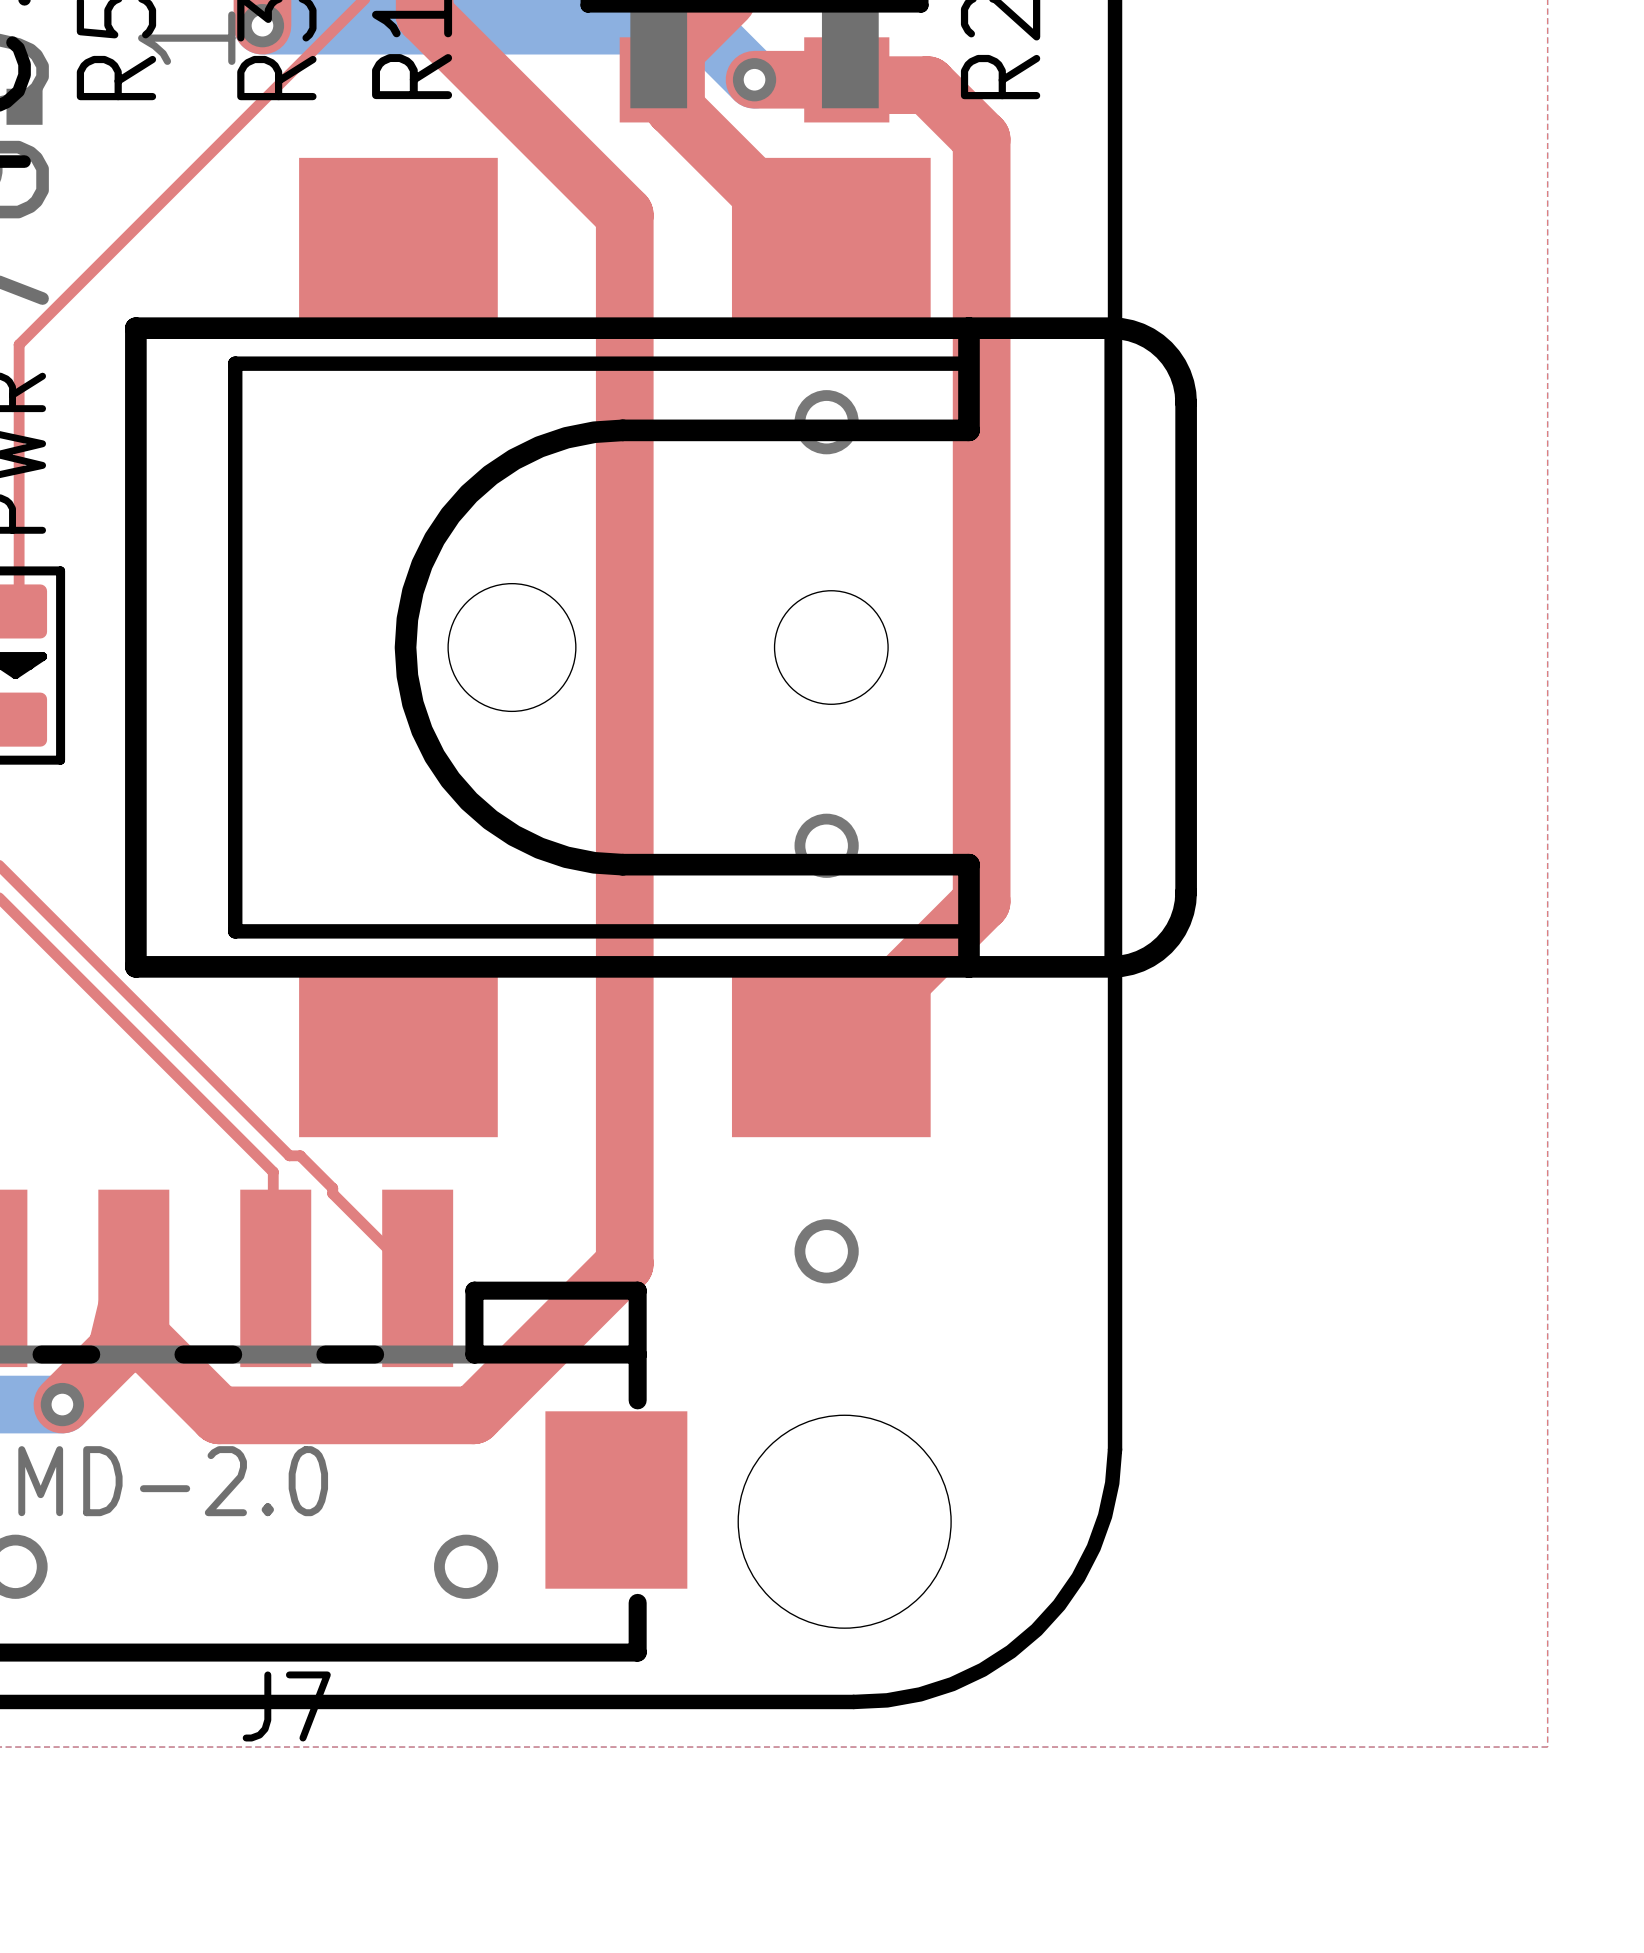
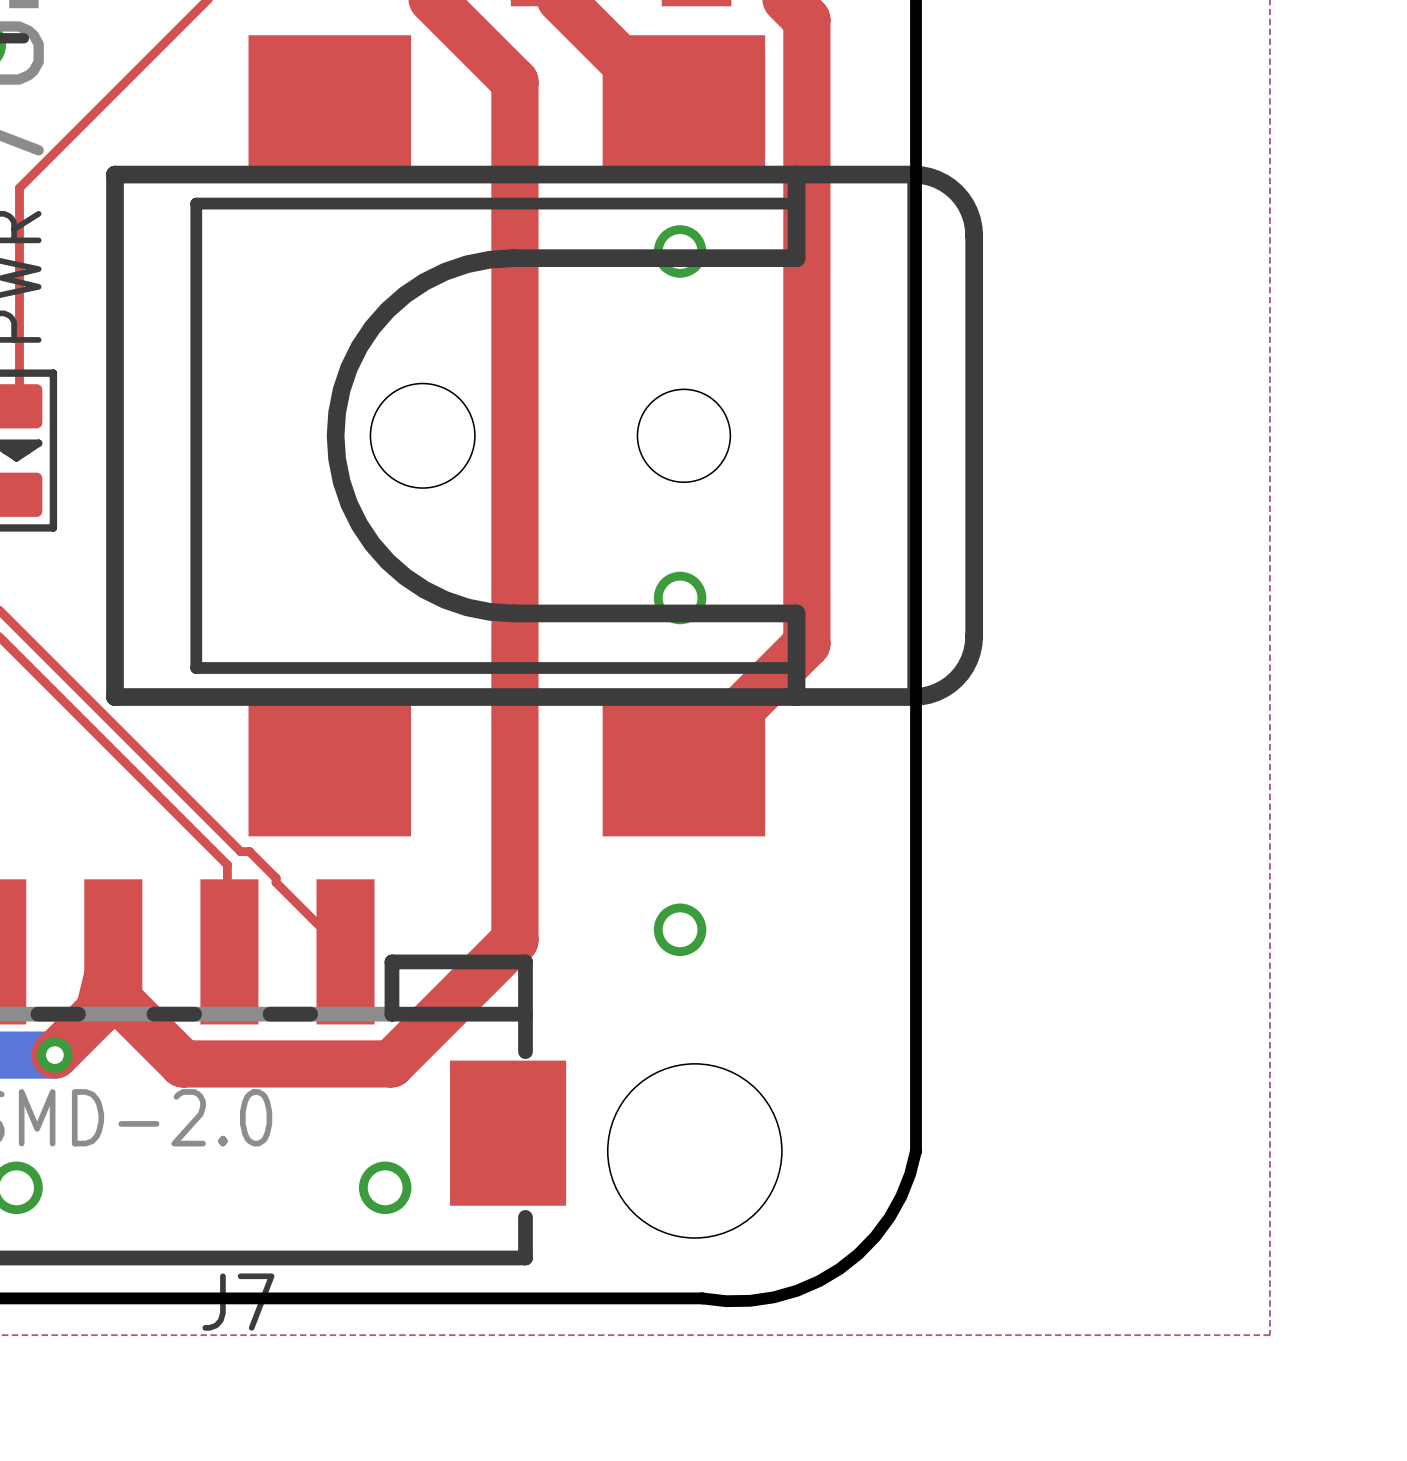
board edge: (1115, 1449) (1112, 1483) (1105, 1515) (1093, 1547) (1078, 1577) (1059, 1605) (1036, 1629) (1010, 1651) (982, 1669) (952, 1684) (920, 1694) (887, 1700) (853, 1701) -> (916, 1091) (916, 1150) (910, 1174) (901, 1196) (889, 1217) (875, 1236) (858, 1254) (839, 1268) (819, 1281) (796, 1290) (773, 1297) (750, 1300) (726, 1301) (702, 1298)

